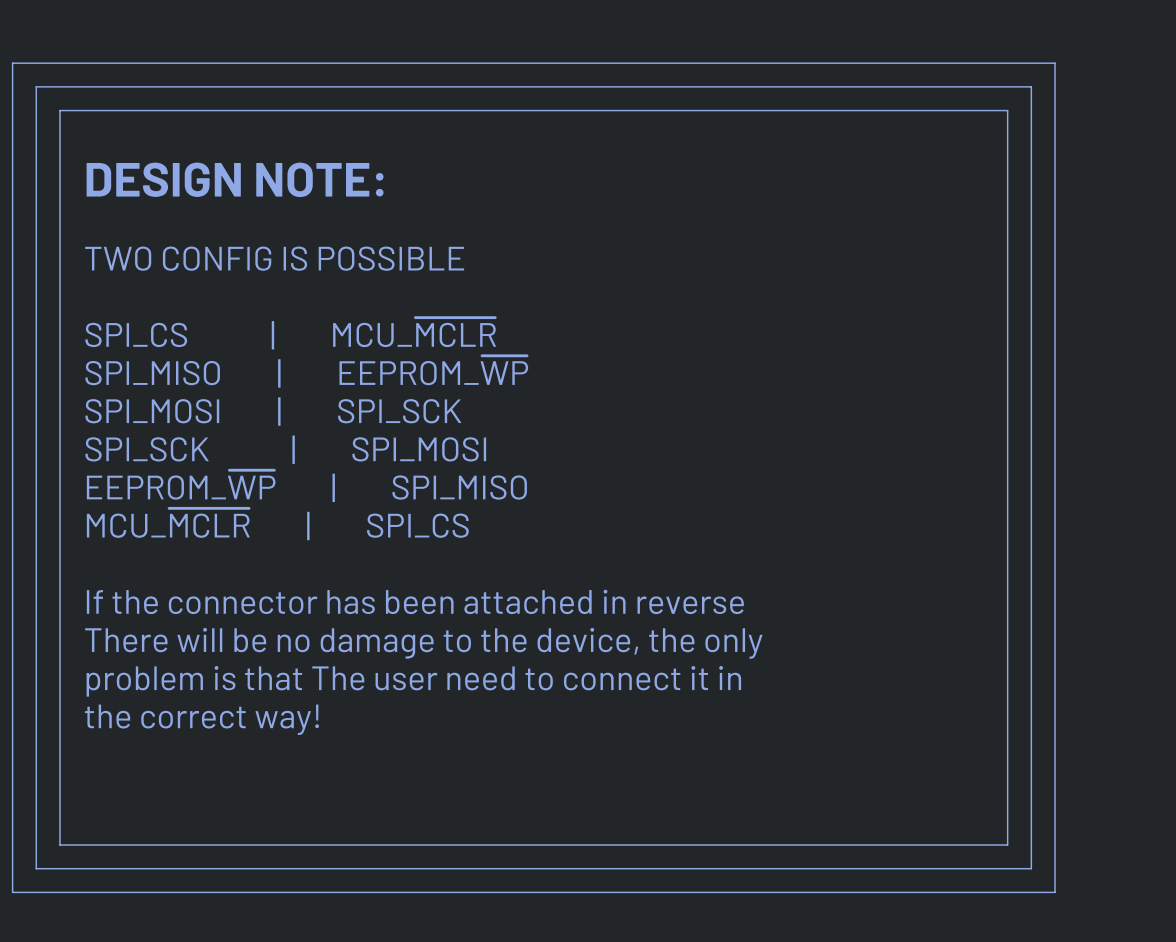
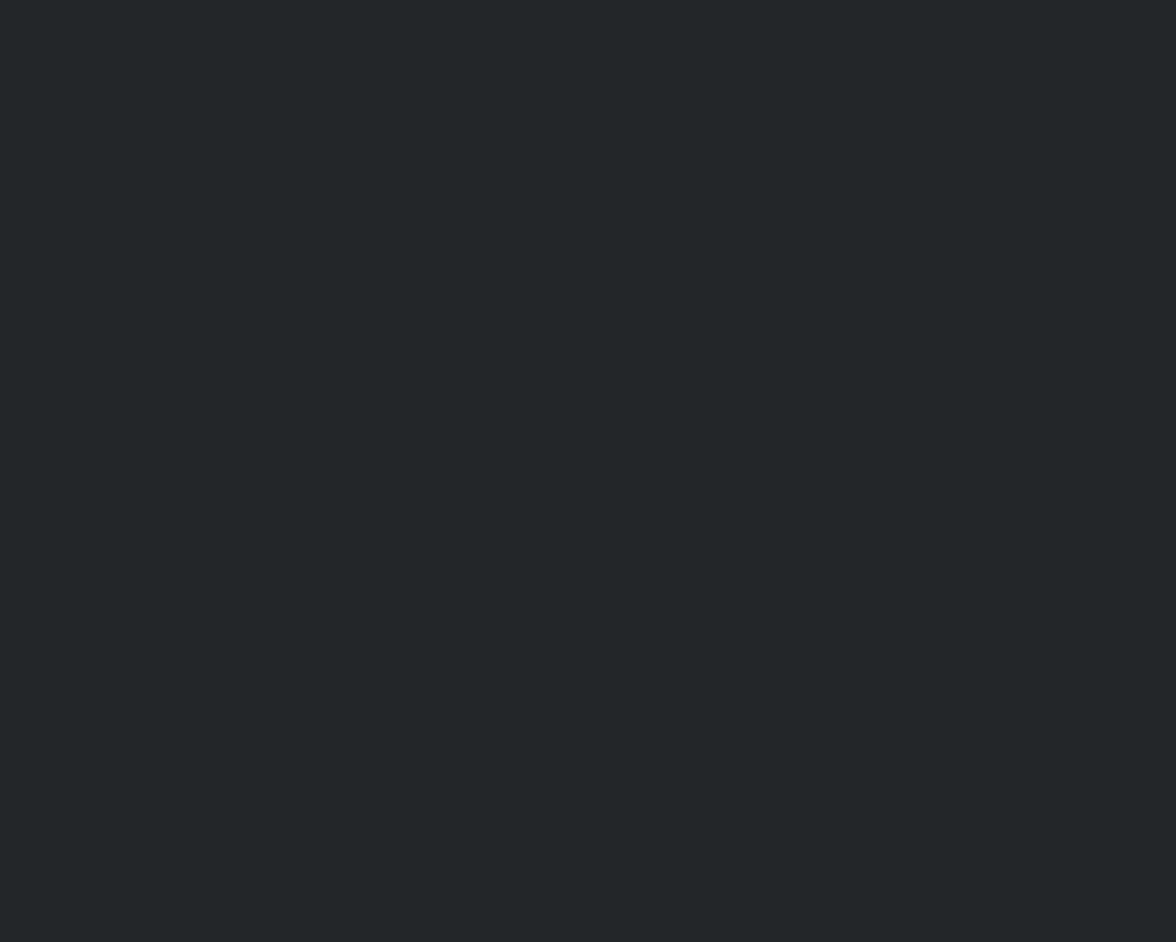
line: (12, 63) (12, 892) (1055, 892) (1055, 63) (12, 63) -> none
line: (36, 86) (36, 868) (1031, 868) (1031, 86) (36, 86) -> none
line: (59, 110) (59, 845) (1007, 845) (1007, 110) (59, 110) -> none
text: DESIGN NOTE: (235, 179) -> none
text: TWO CONFIG IS POSSIBLE (274, 258) -> none
text: SPI_CS | MCU_~{MCLR} (290, 333) -> none
text: SPI_MISO | EEPROM_~{WP} (306, 371) -> none
text: SPI_MOSI | SPI_SCK (273, 411) -> none
text: SPI_SCK | SPI_MOSI (285, 449) -> none
text: EEPROM_~{WP} | SPI_MISO (306, 486) -> none
text: MCU_~{MCLR} | SPI_CS (277, 524) -> none
text: If the connector has been attached in reverse (415, 601) -> none
text: There will be no damage to the device, the only (423, 643) -> none
text: problem is that The user need to connect it in (413, 681) -> none
text: the correct way! (201, 719) -> none

